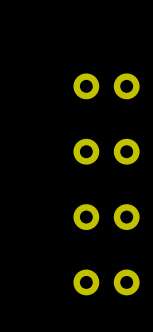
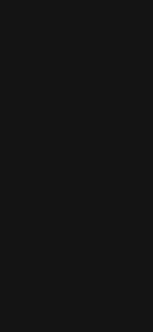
part: (106, 86) -> none
part: (106, 151) -> none
part: (106, 217) -> none
part: (106, 282) -> none

